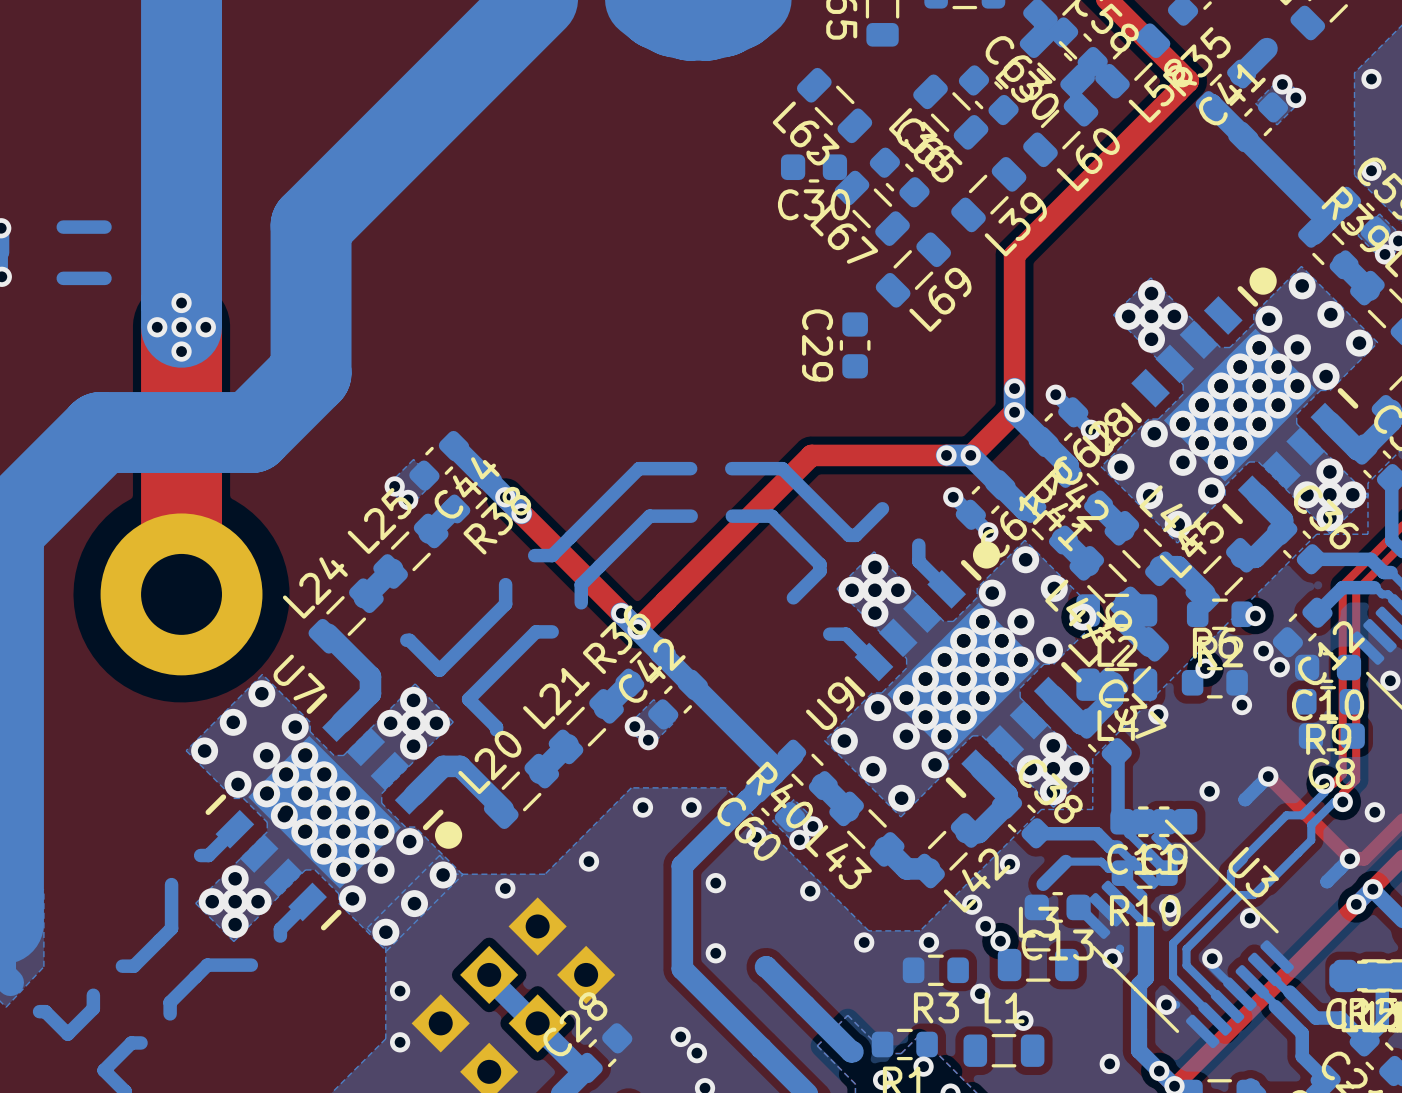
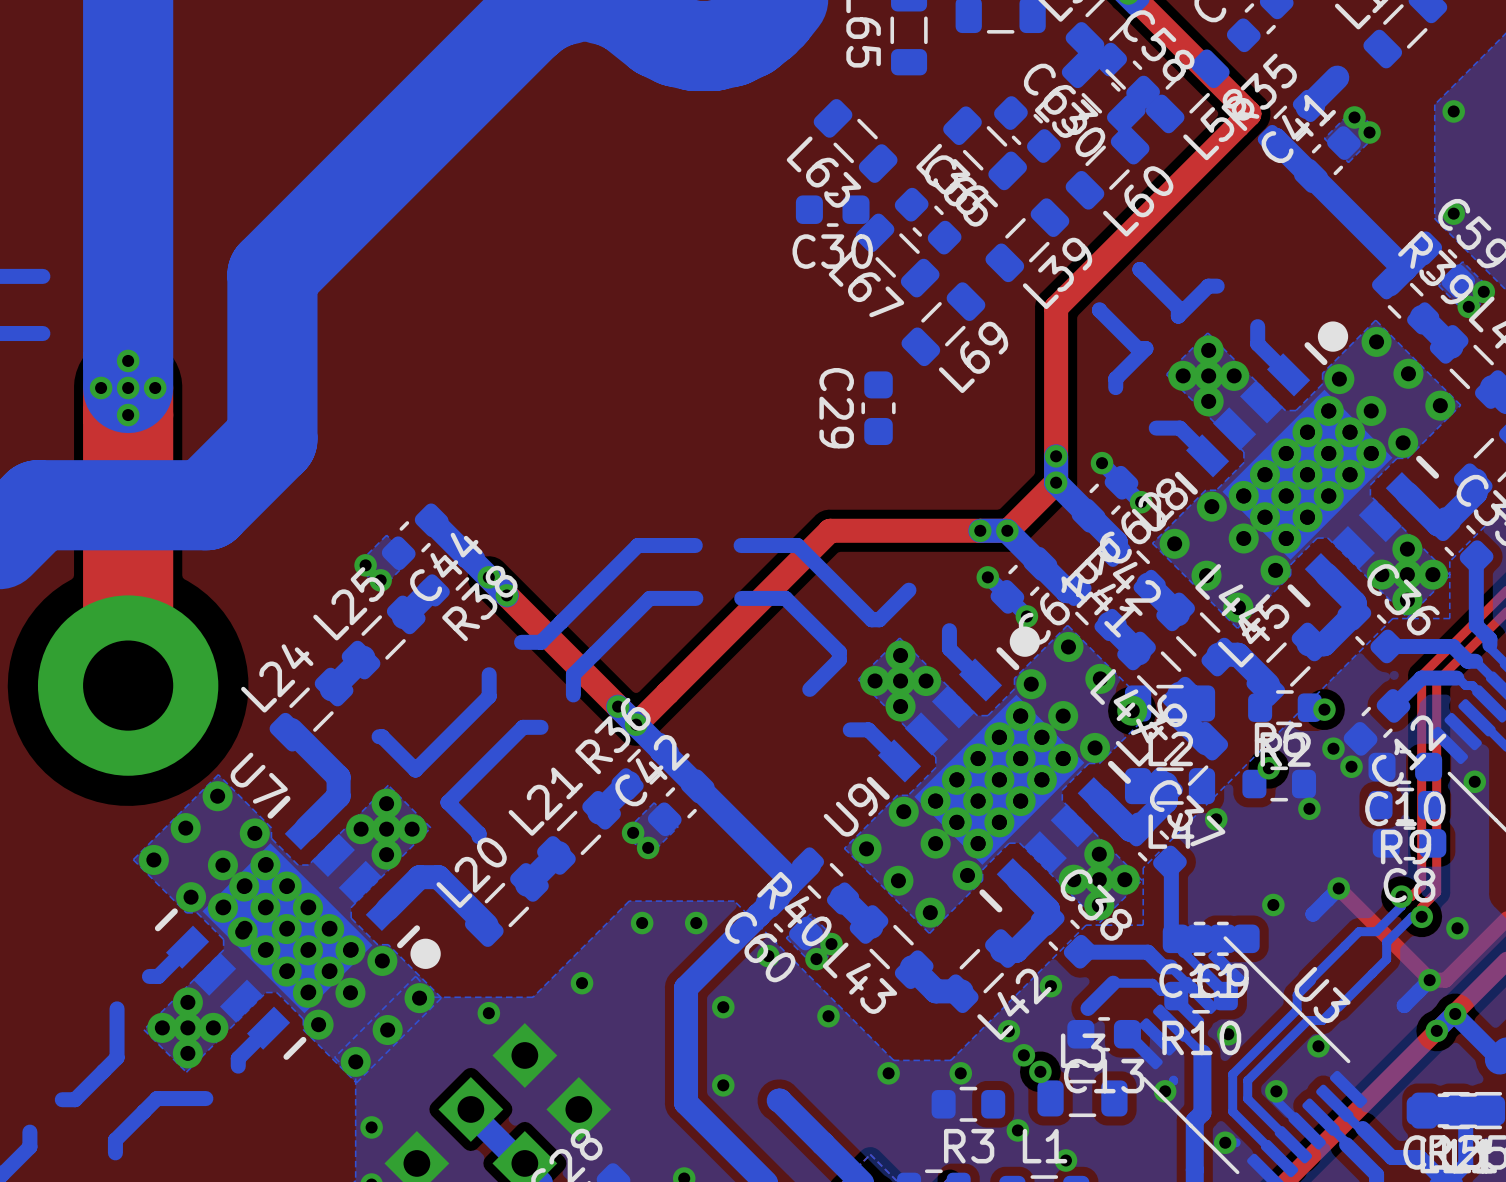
bottom track: none -> (1139, 269) (1178, 308) (1178, 316) (1208, 286) (1217, 286)
bottom track: none -> (1099, 310) (1137, 348) (1145, 348) (1115, 378) (1115, 387)
bottom track: none -> (1257, 326) (1257, 343) (1288, 374)
bottom track: none -> (1156, 428) (1179, 428) (1207, 455)

